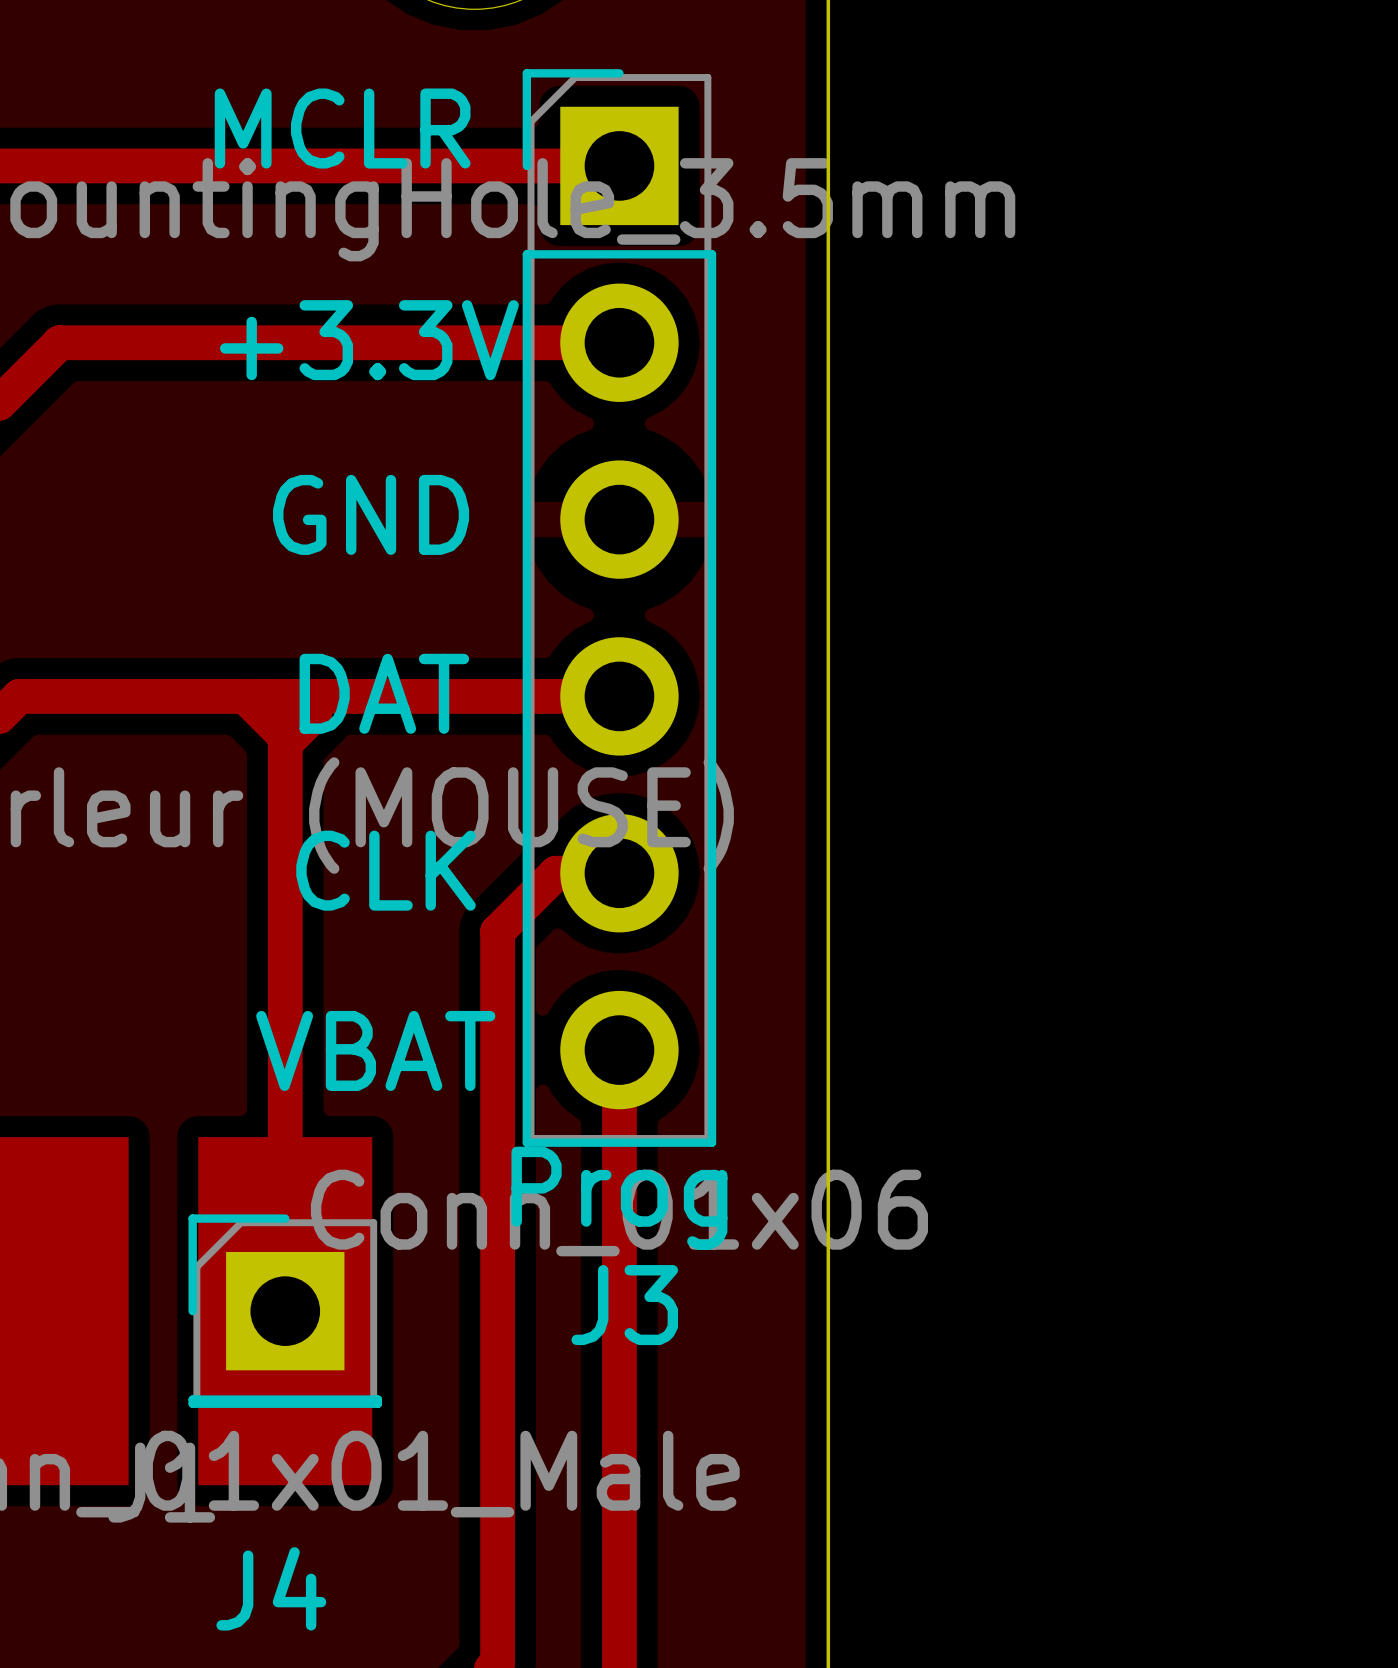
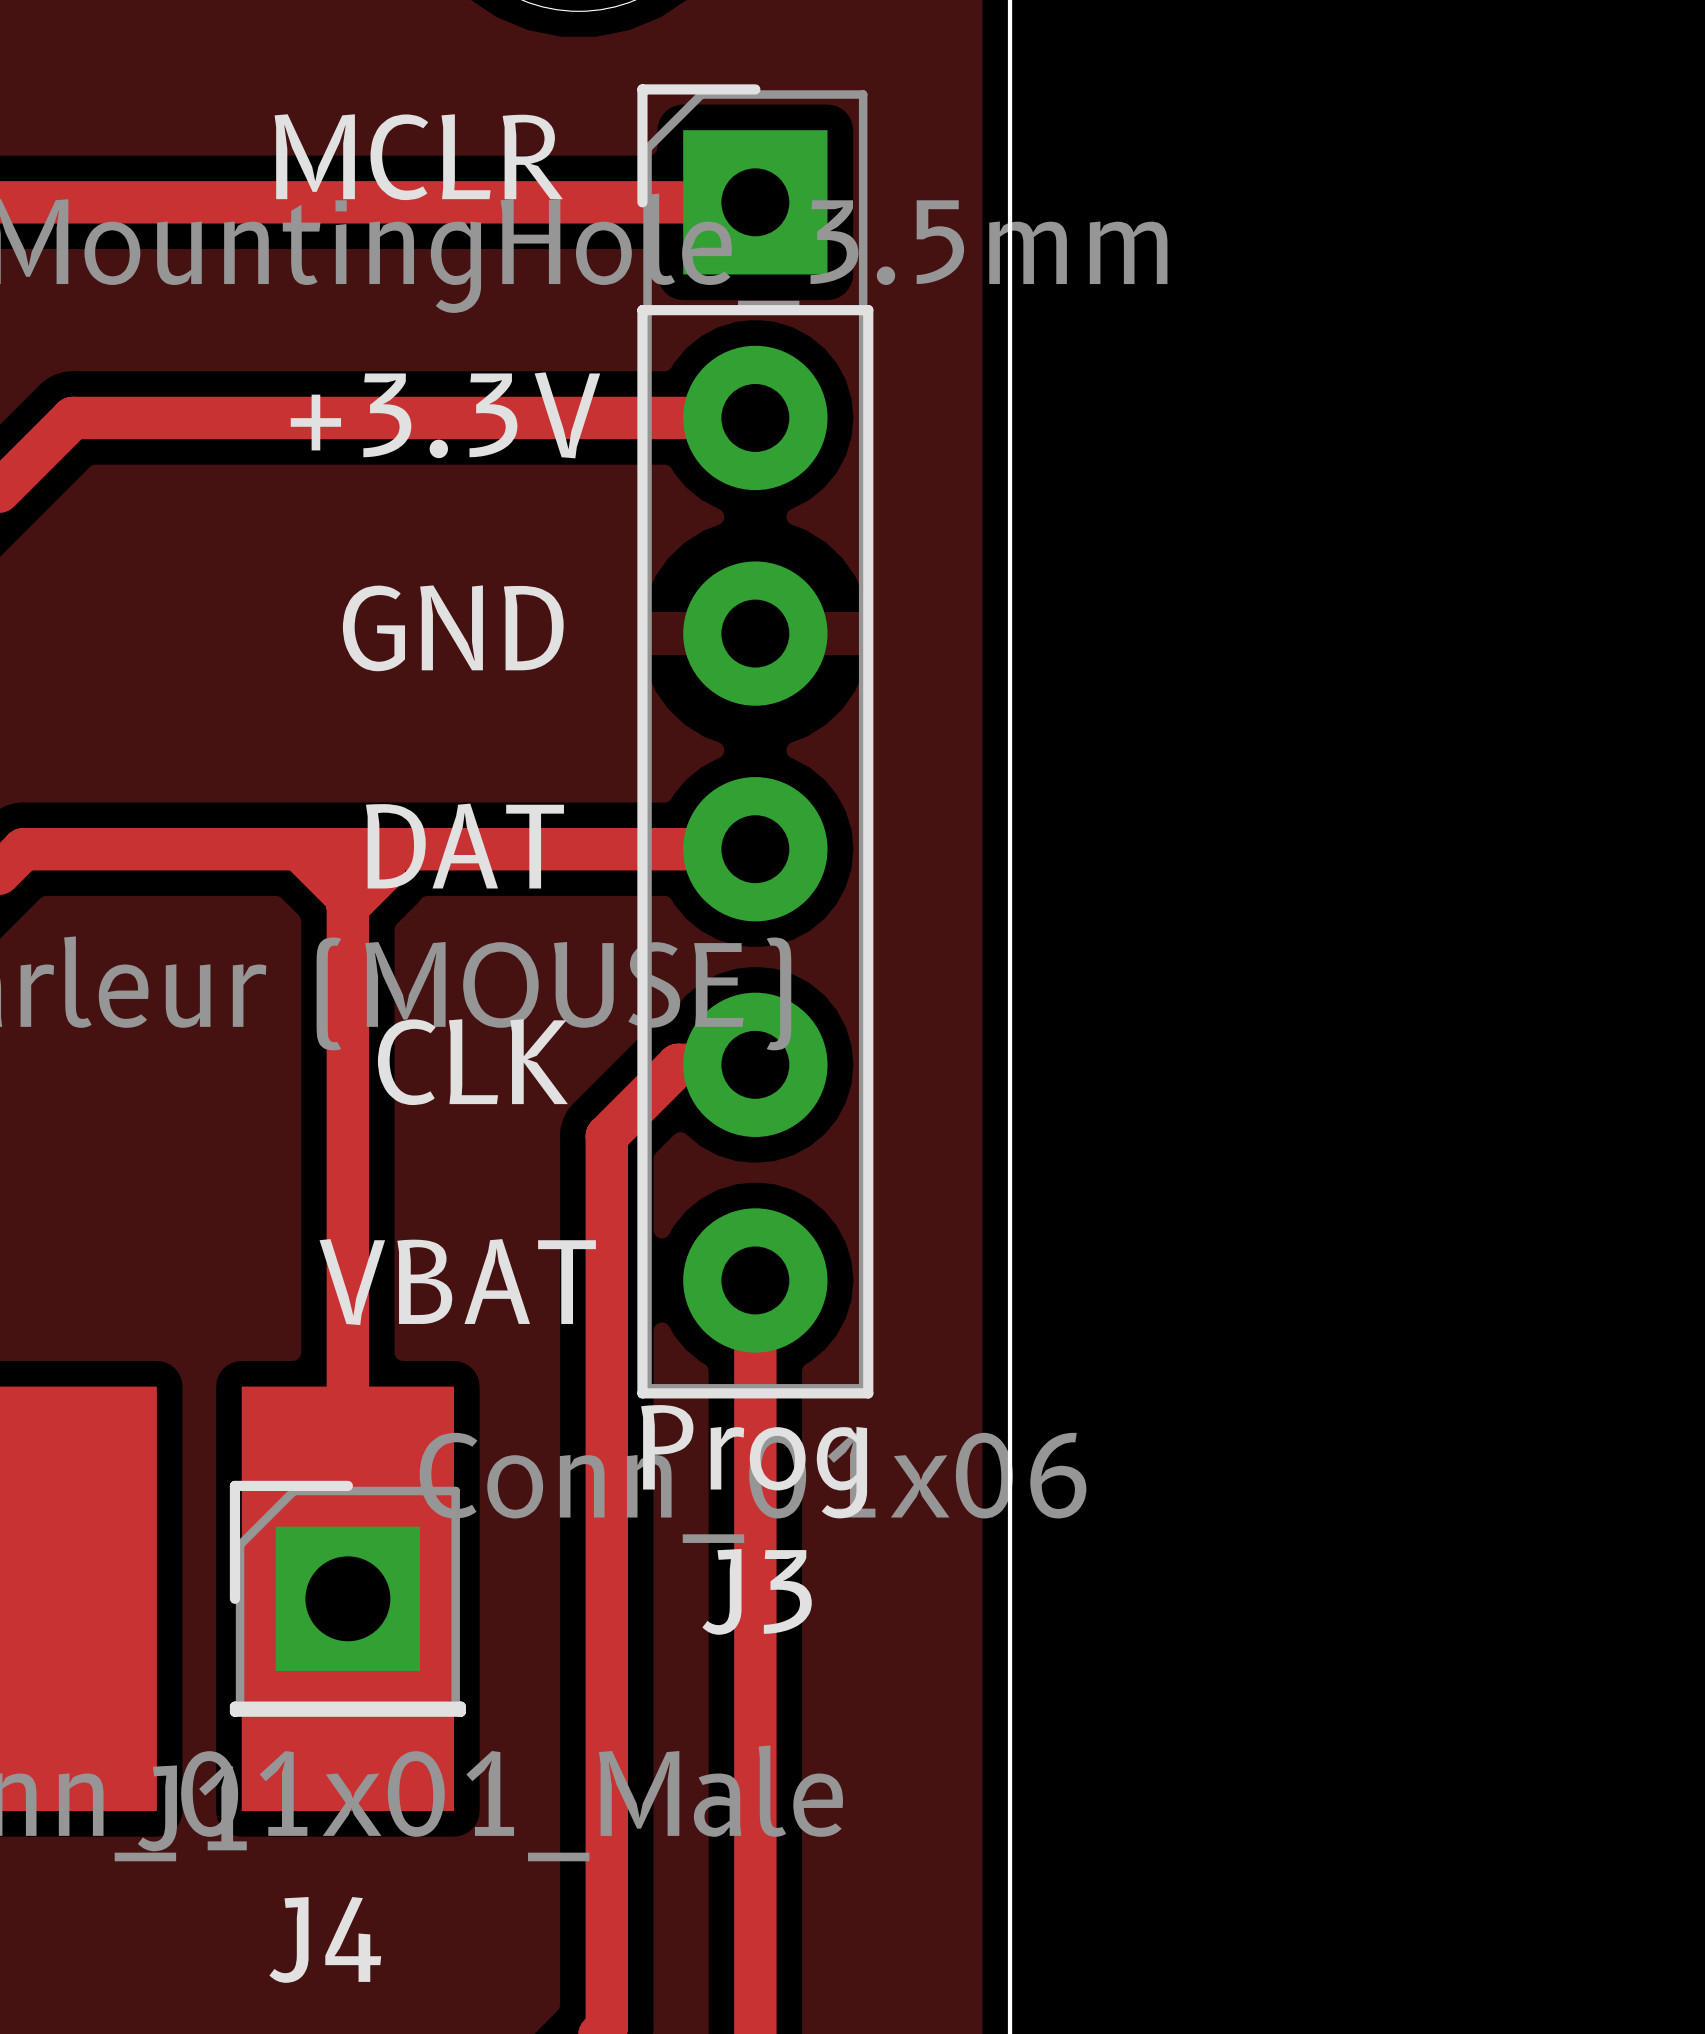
J3 footprint: [522, 69, 717, 1147] -> [637, 84, 874, 1399]

